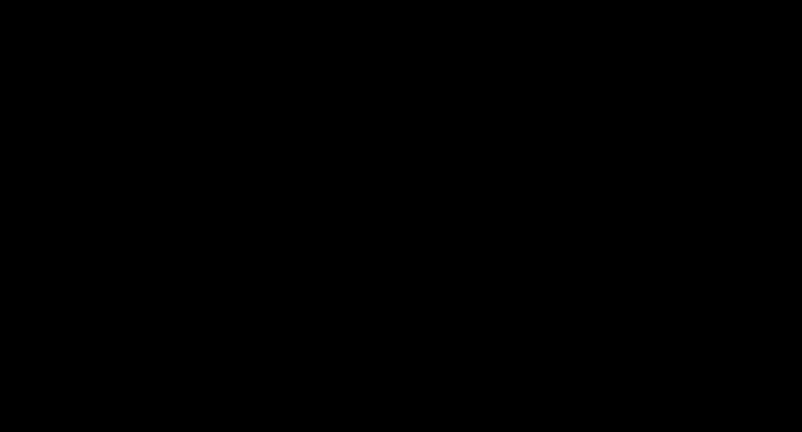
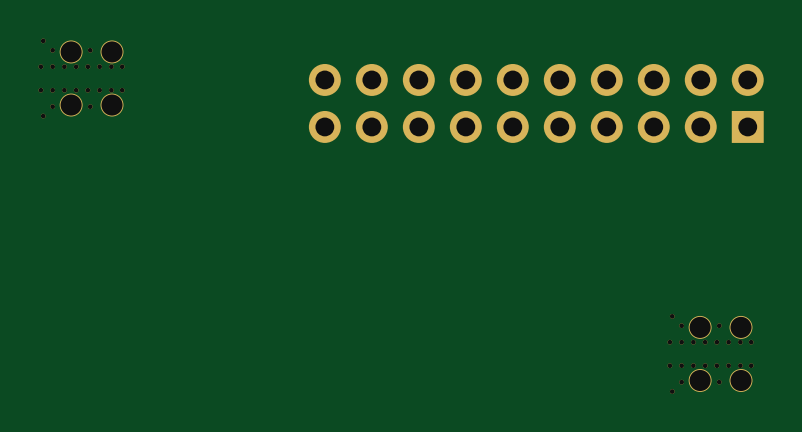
part: none -> (81, 78)
part: none -> (536, 103)
part: none -> (710, 353)

